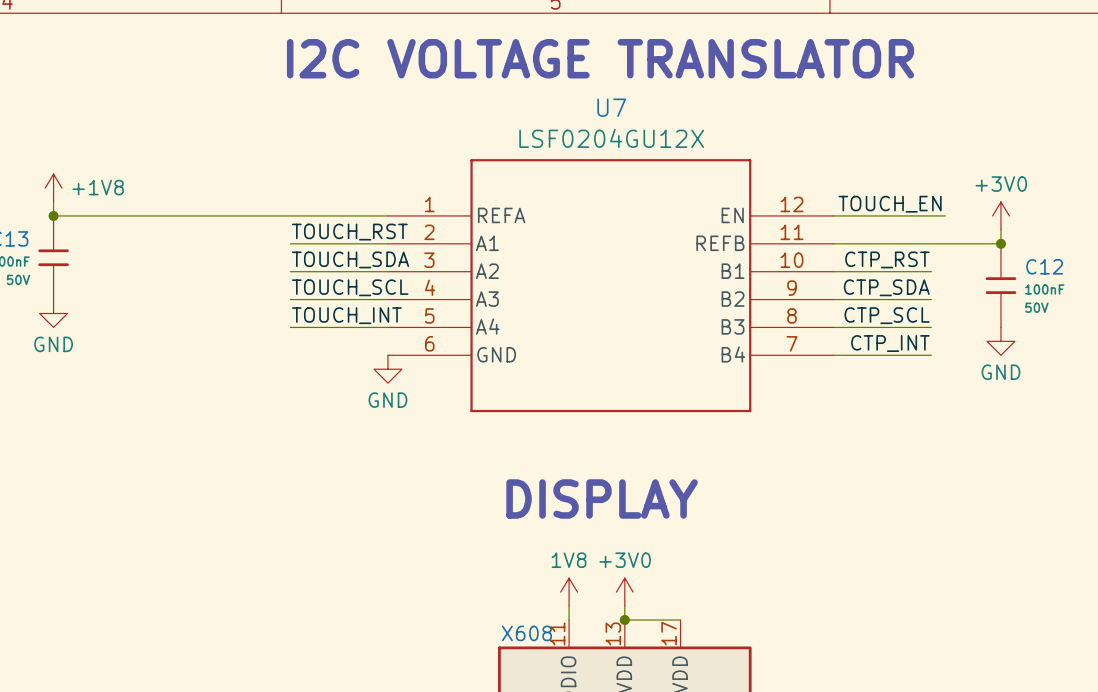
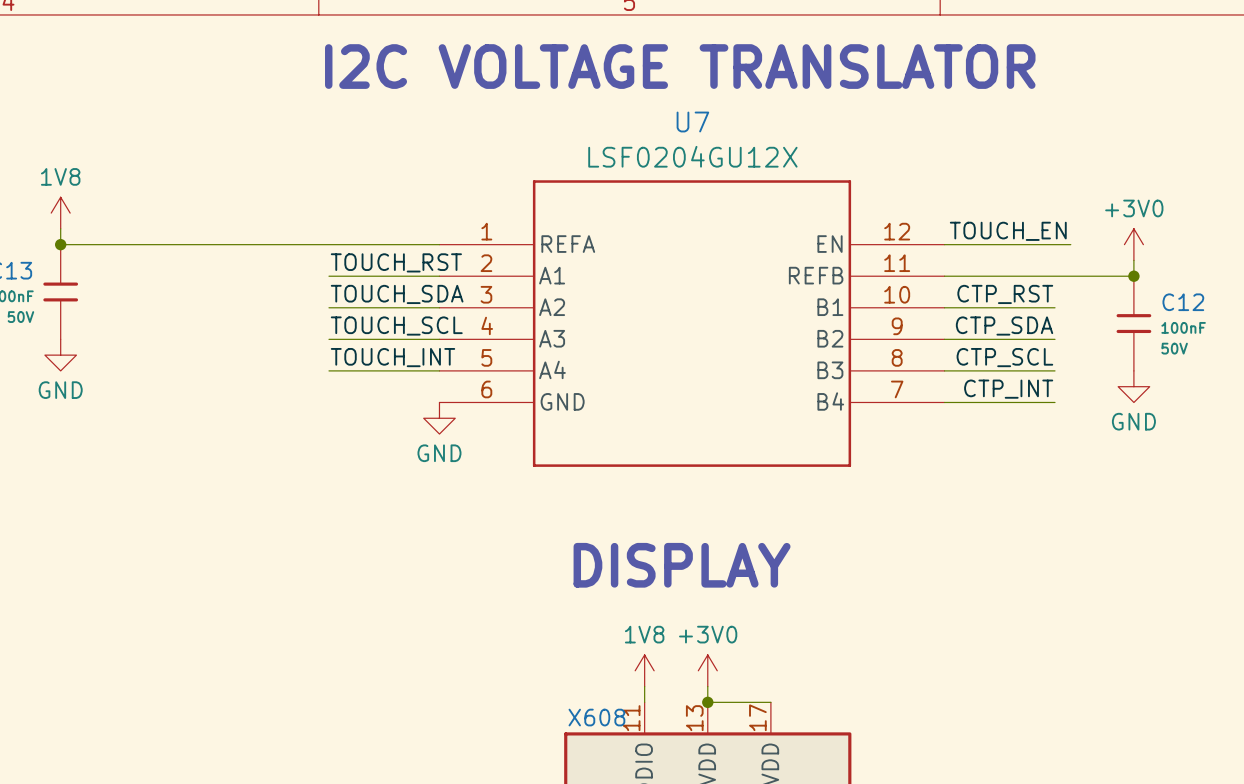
power symbol: +1V8 (53, 188) -> 1V8 (60, 213)

